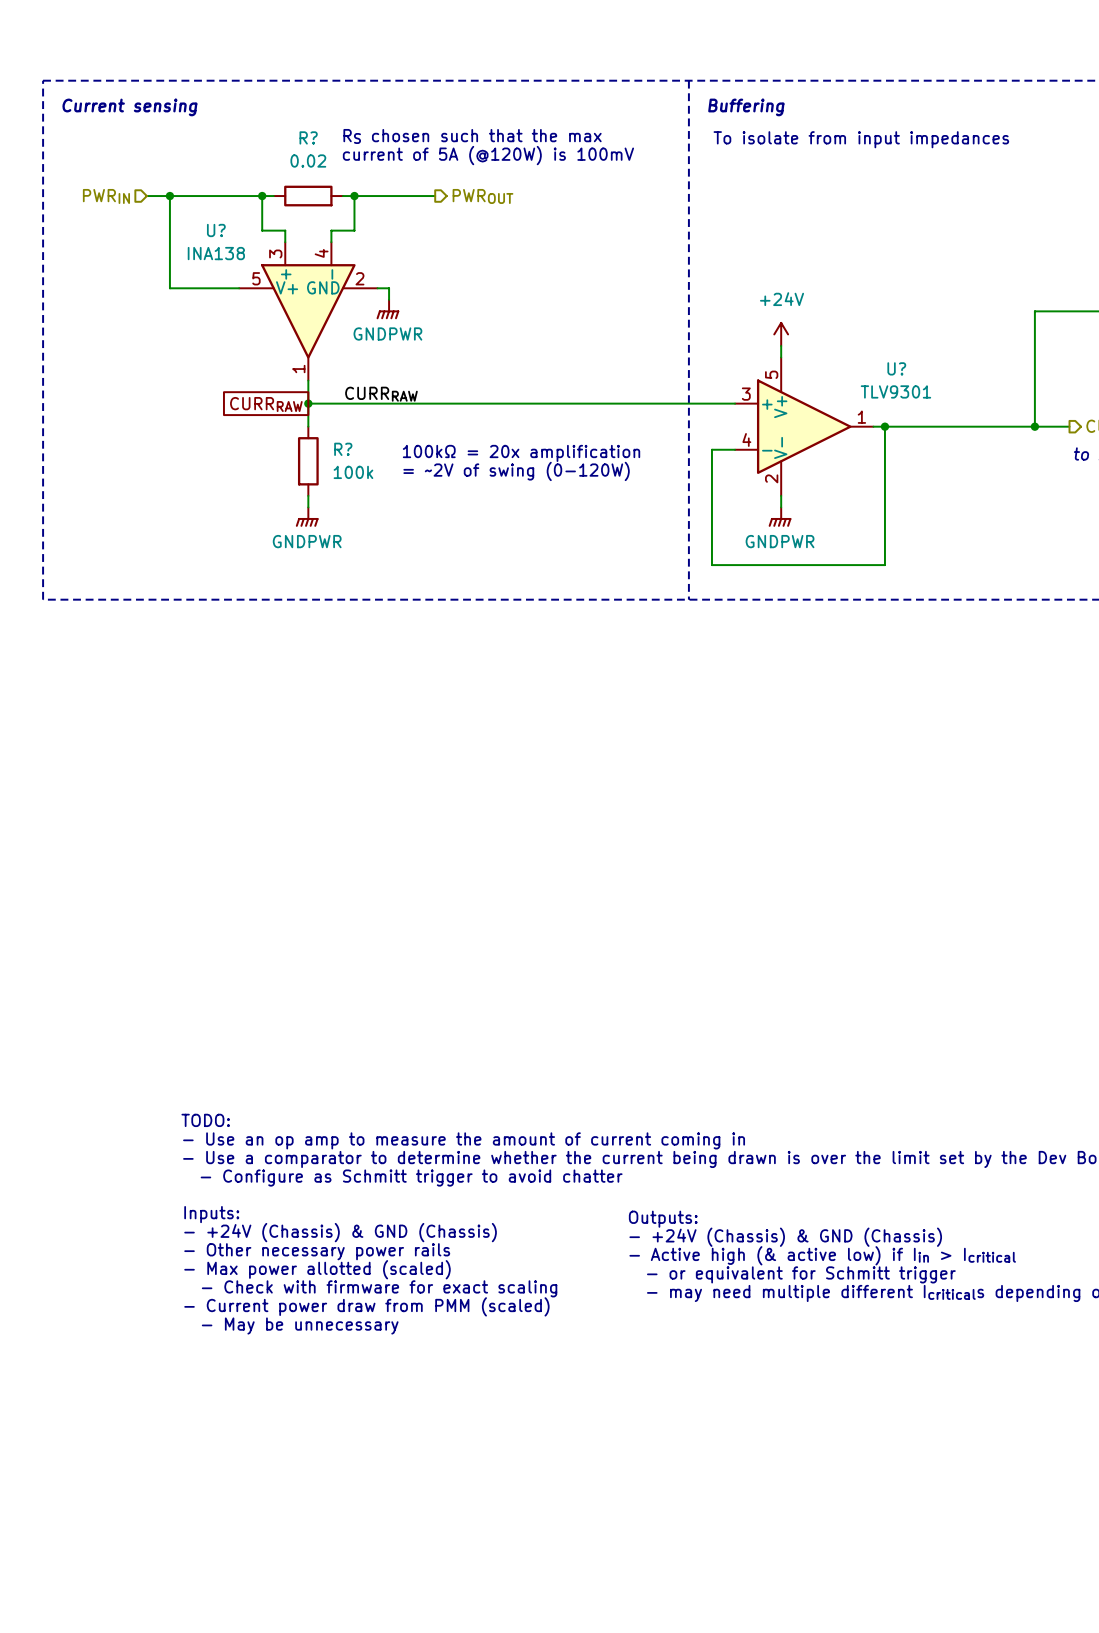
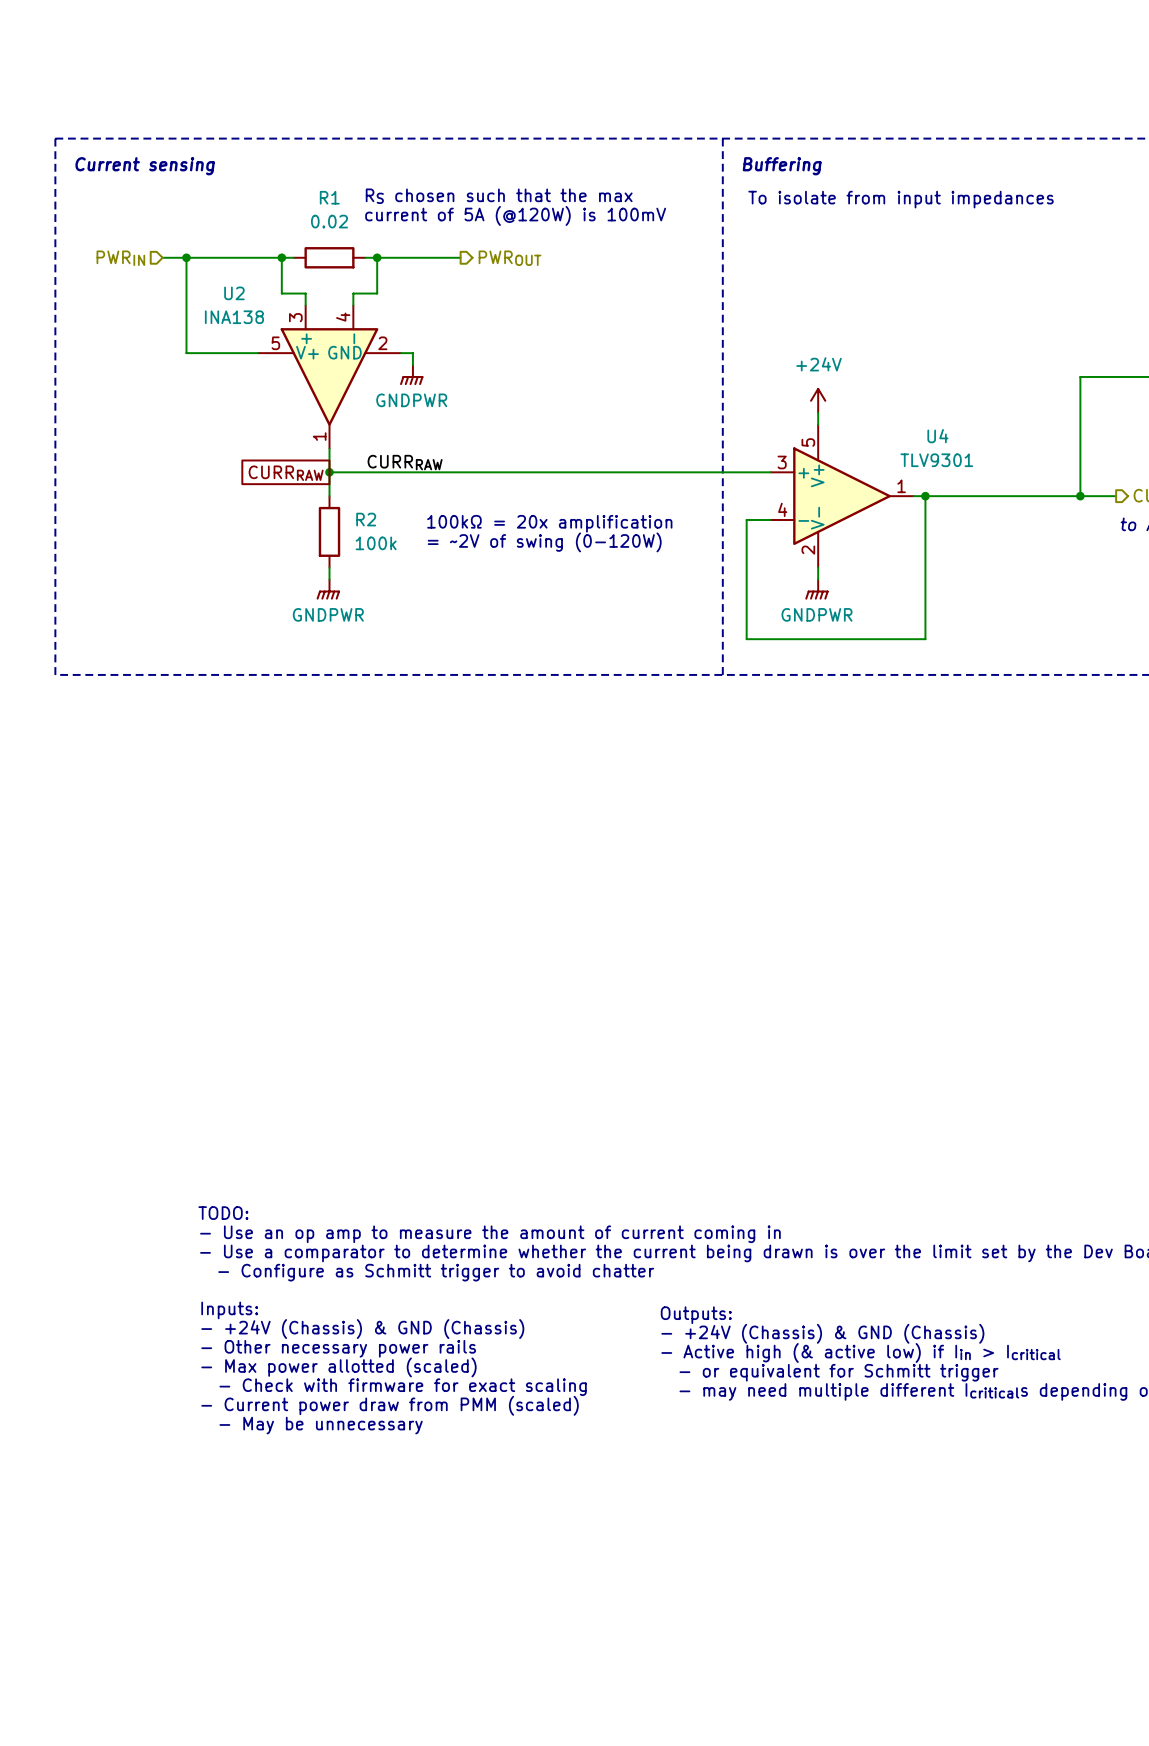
R? name: R? (308, 137) -> R1 (329, 197)
U? name: U? (216, 230) -> U2 (234, 293)
U? name: U? (896, 368) -> U4 (937, 436)
R? name: R? (343, 449) -> R2 (366, 519)

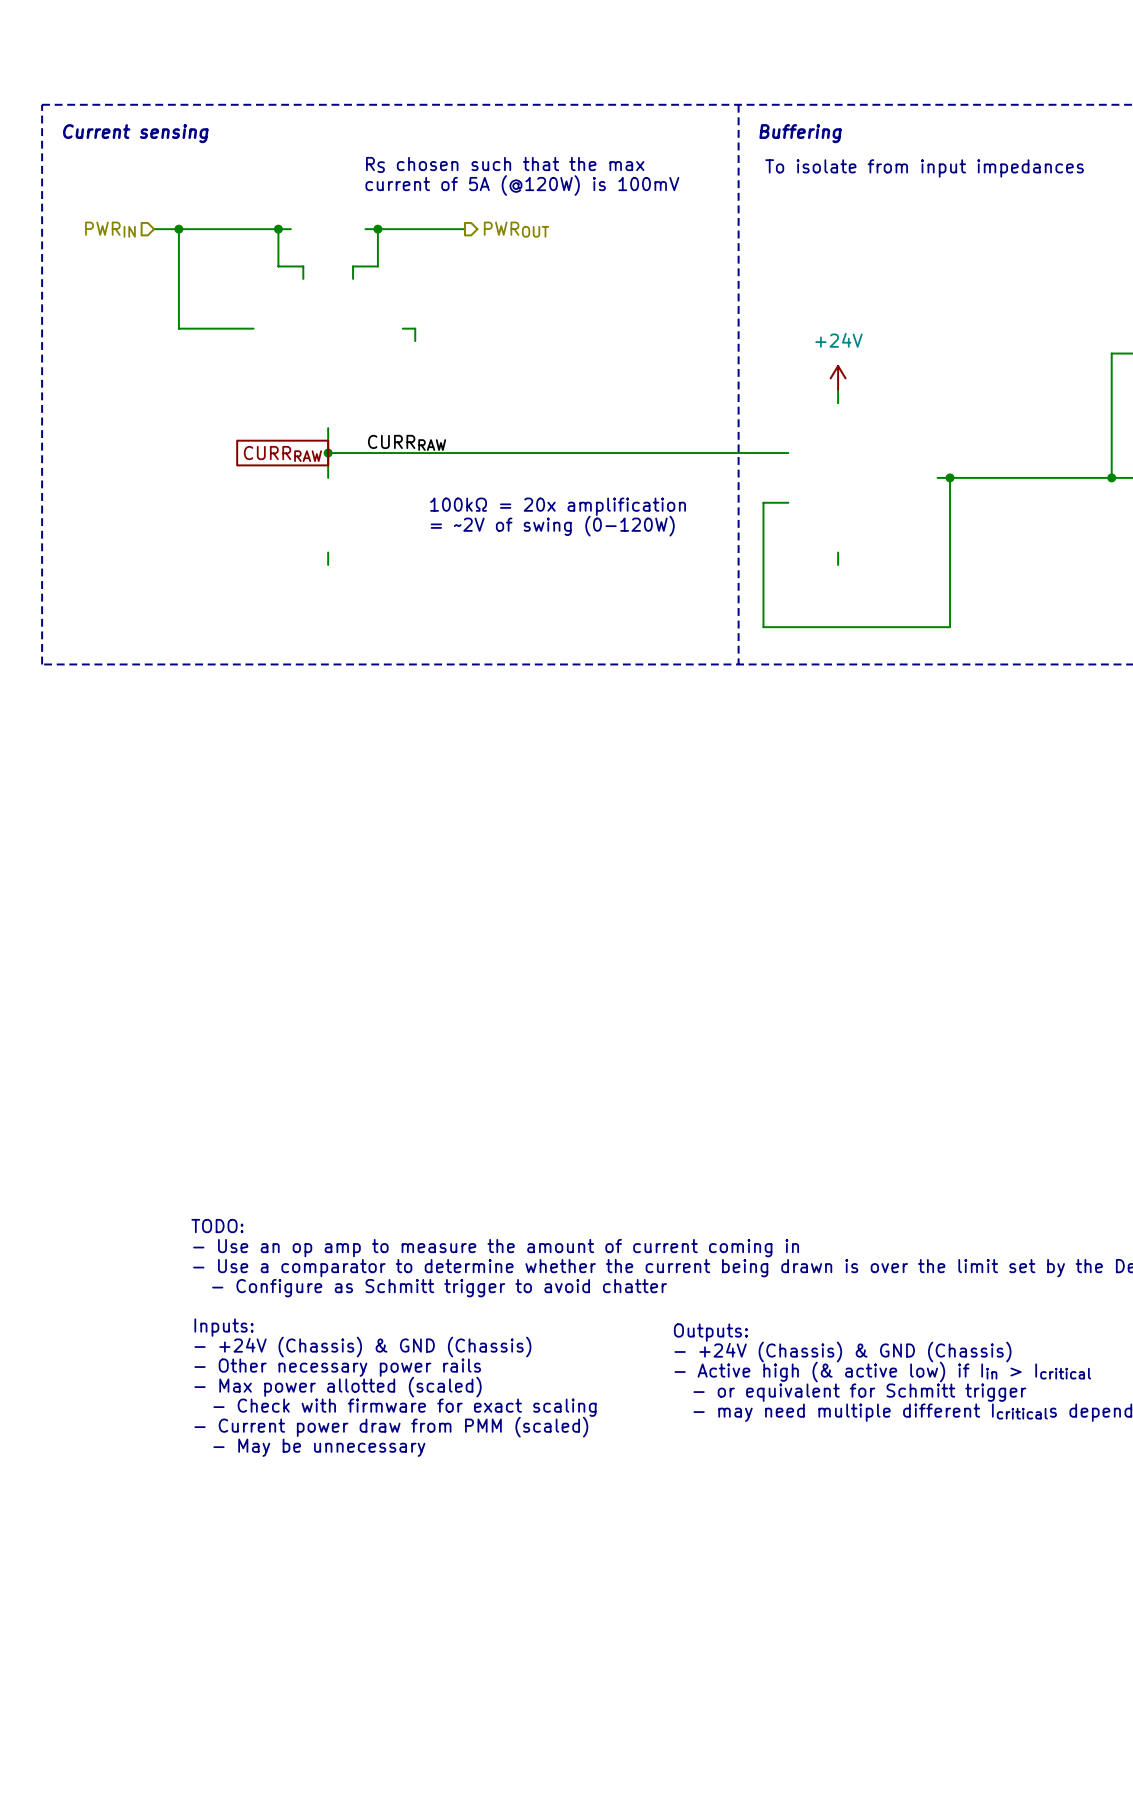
R1: 0.02 (329, 257) -> none
power symbol: GNDPWR (411, 375) -> none
U2: INA138 (329, 376) -> none
U4: TLV9301 (842, 496) -> none
R2: 100k (329, 531) -> none
power symbol: GNDPWR (328, 589) -> none
power symbol: GNDPWR (816, 589) -> none

